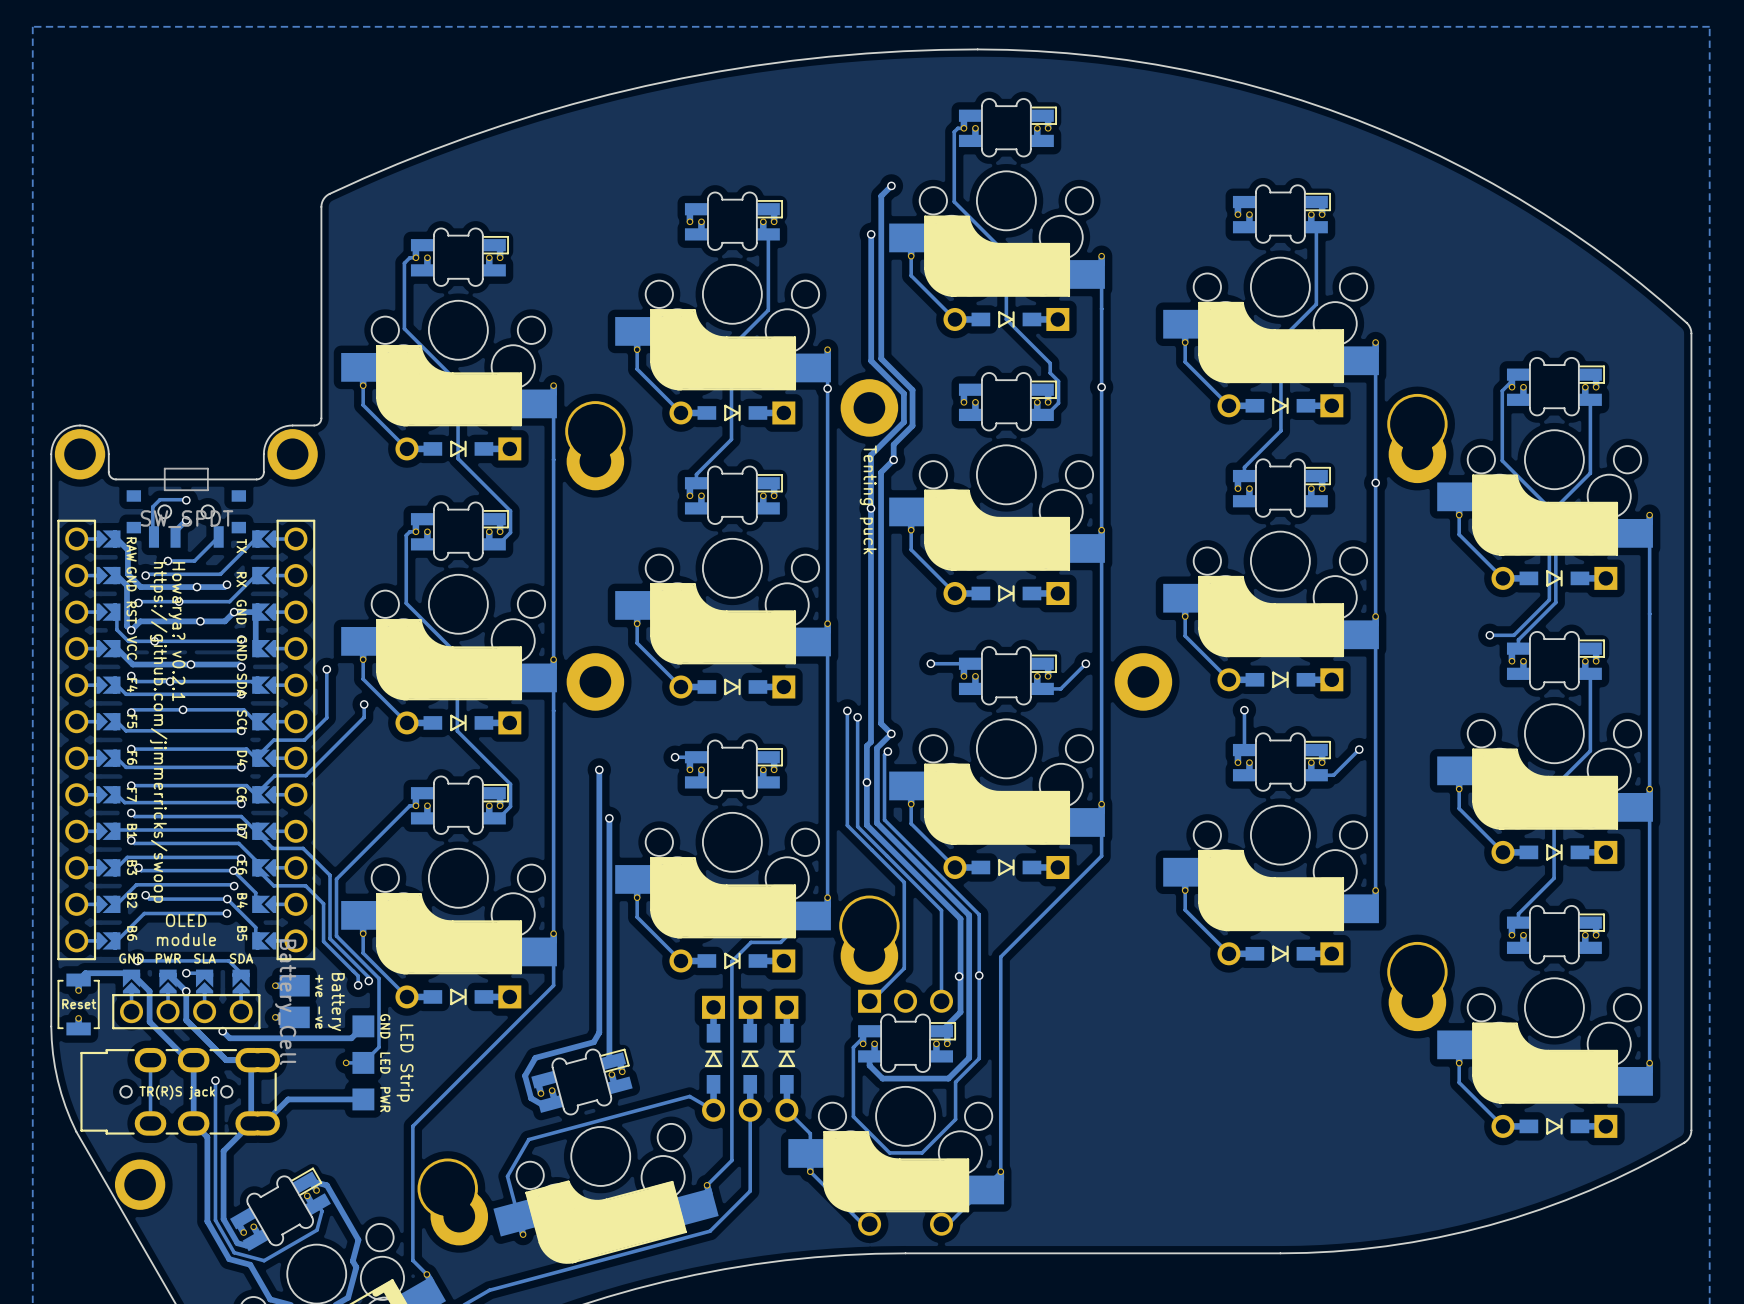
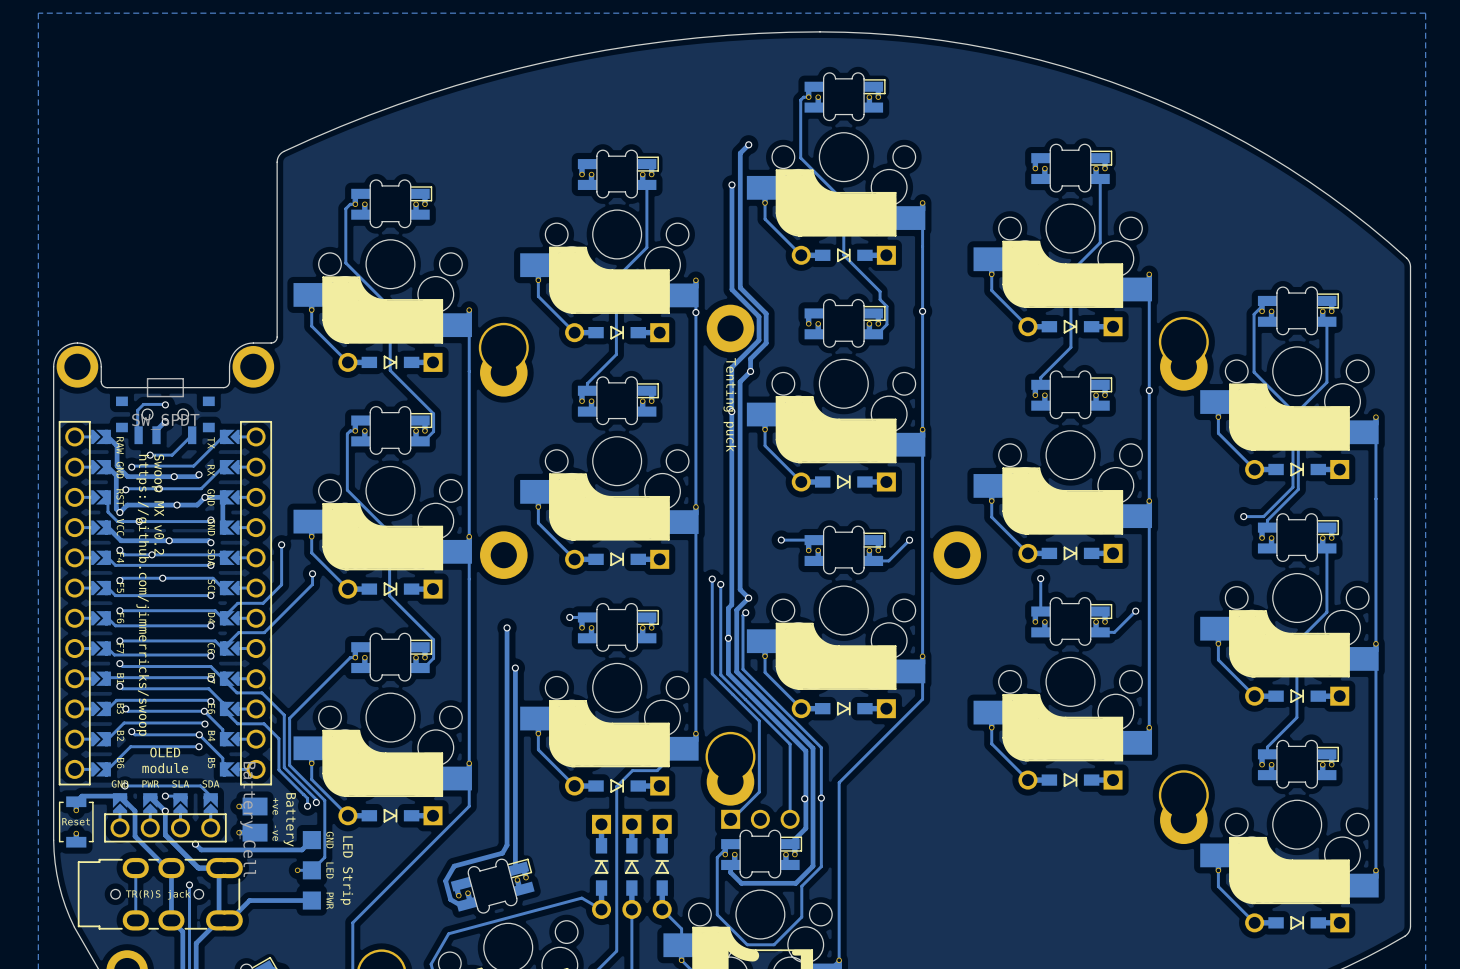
text: Howarya? v0.2.1 (176, 631) -> Swoop MX v0.2 (157, 504)

